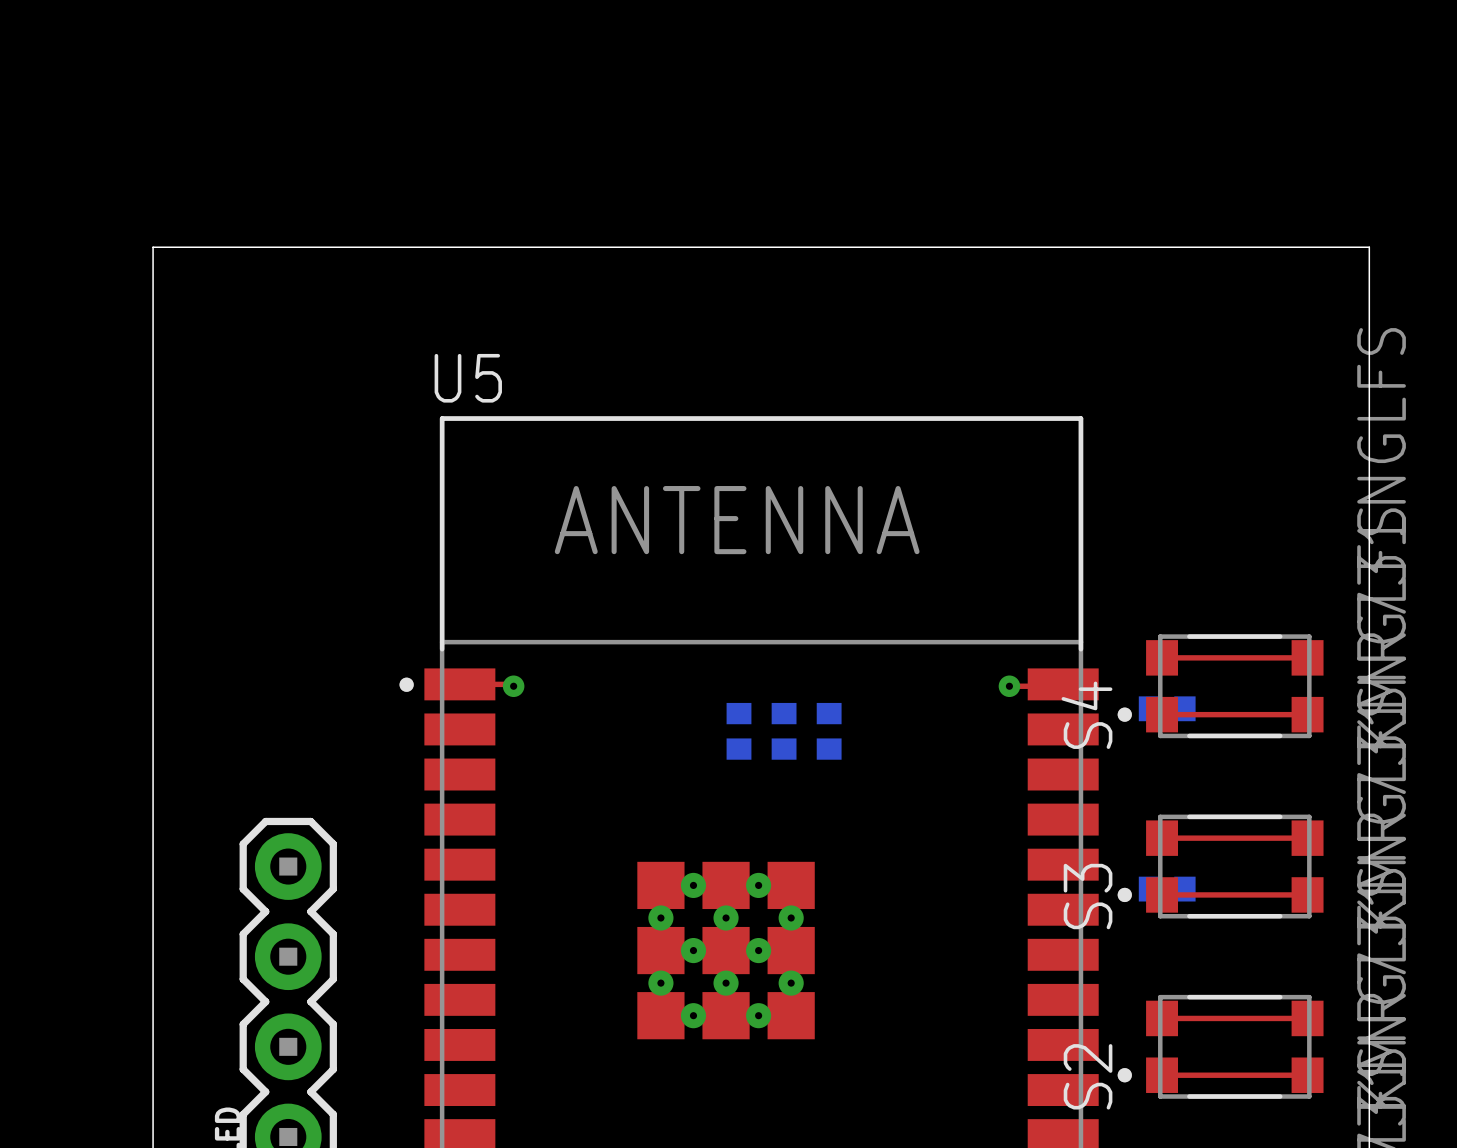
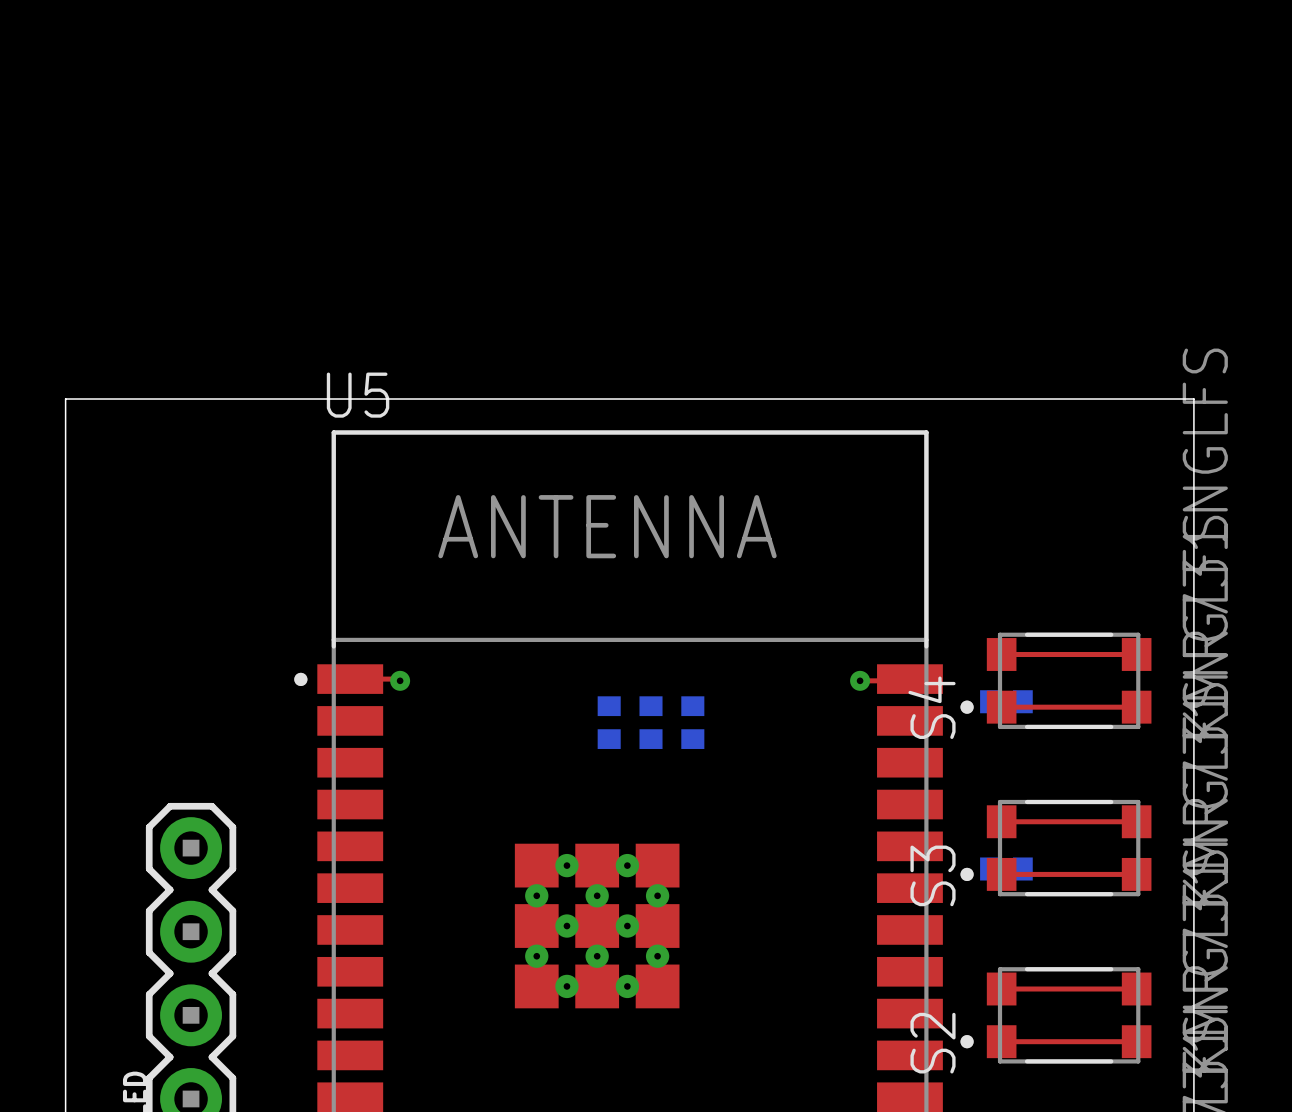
board edge: (153, 382) (153, 247) (1369, 247) (1369, 382) -> (65, 399) (1193, 399)

